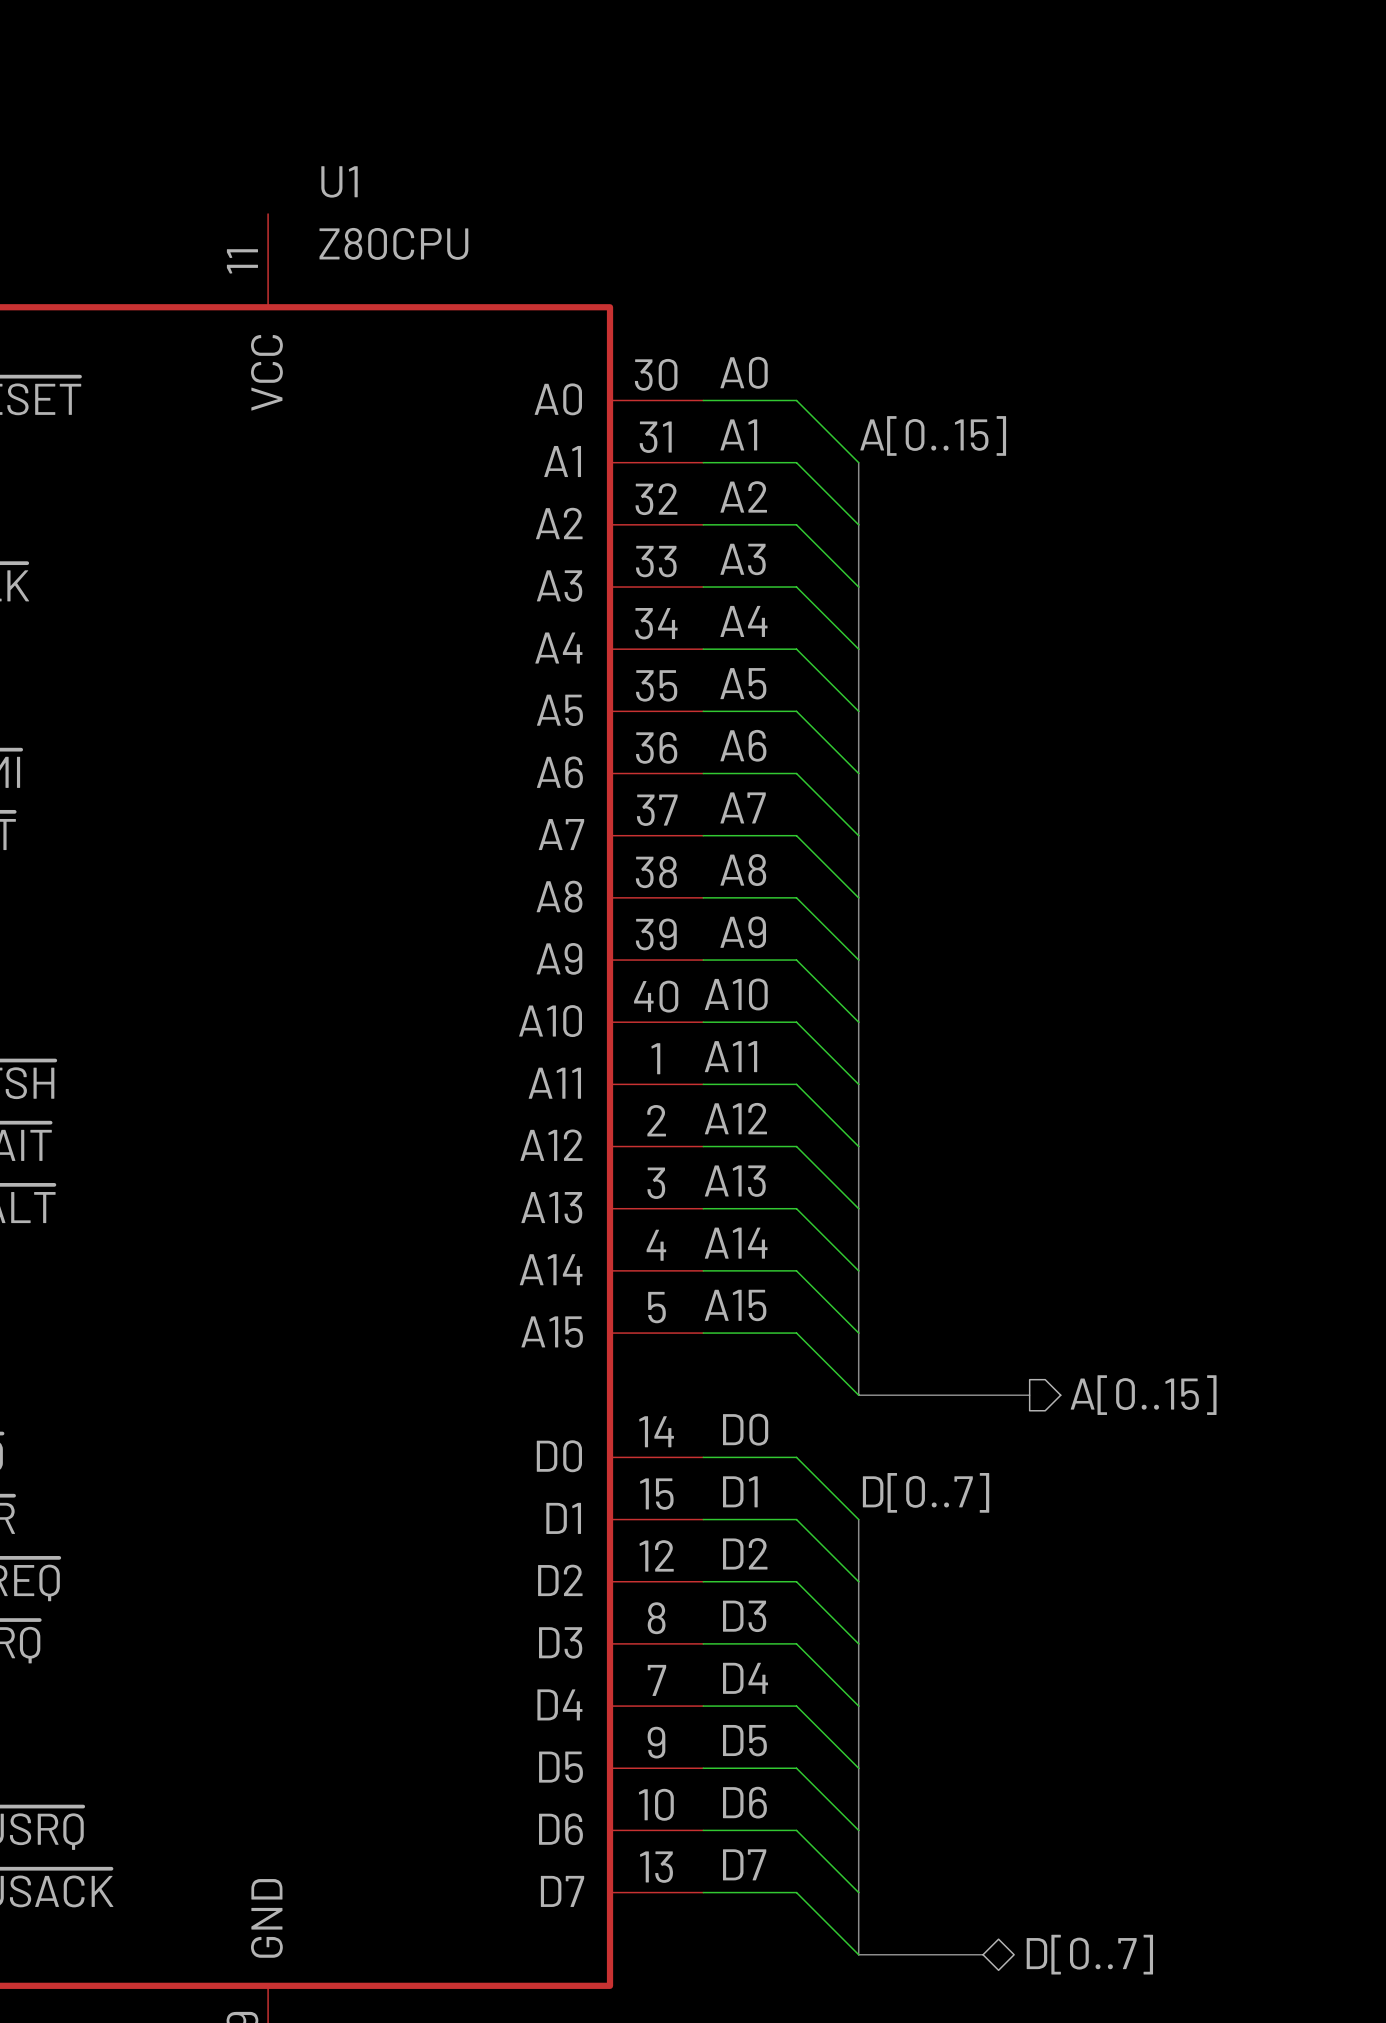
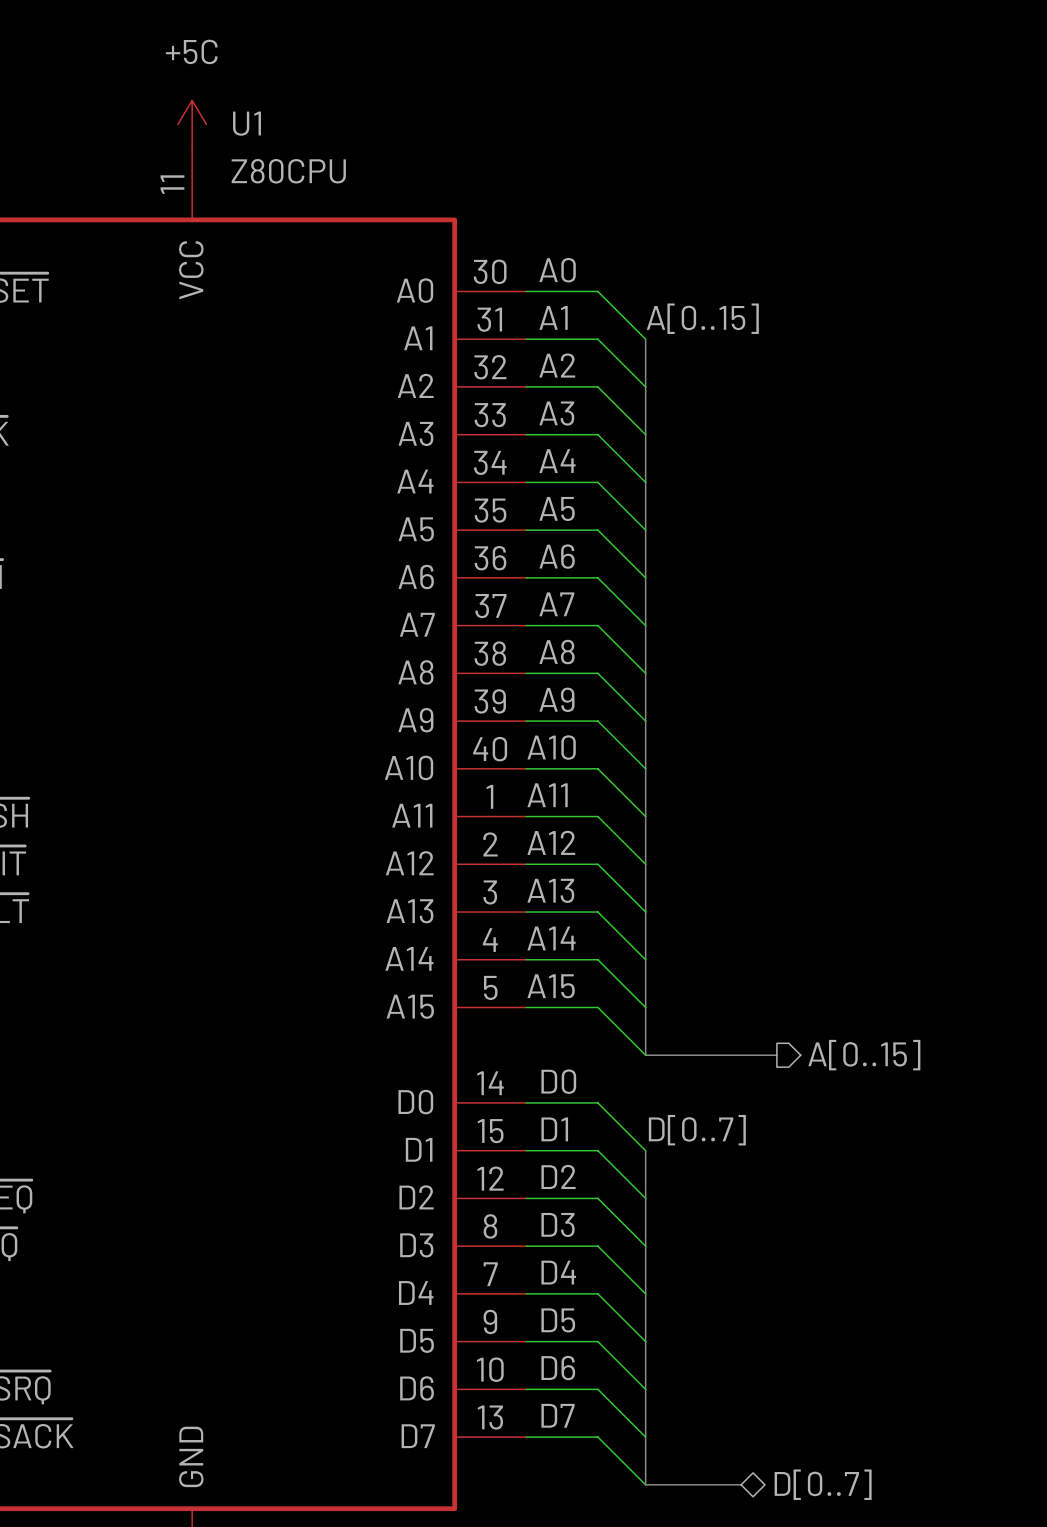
power symbol: none -> +5C (192, 124)

